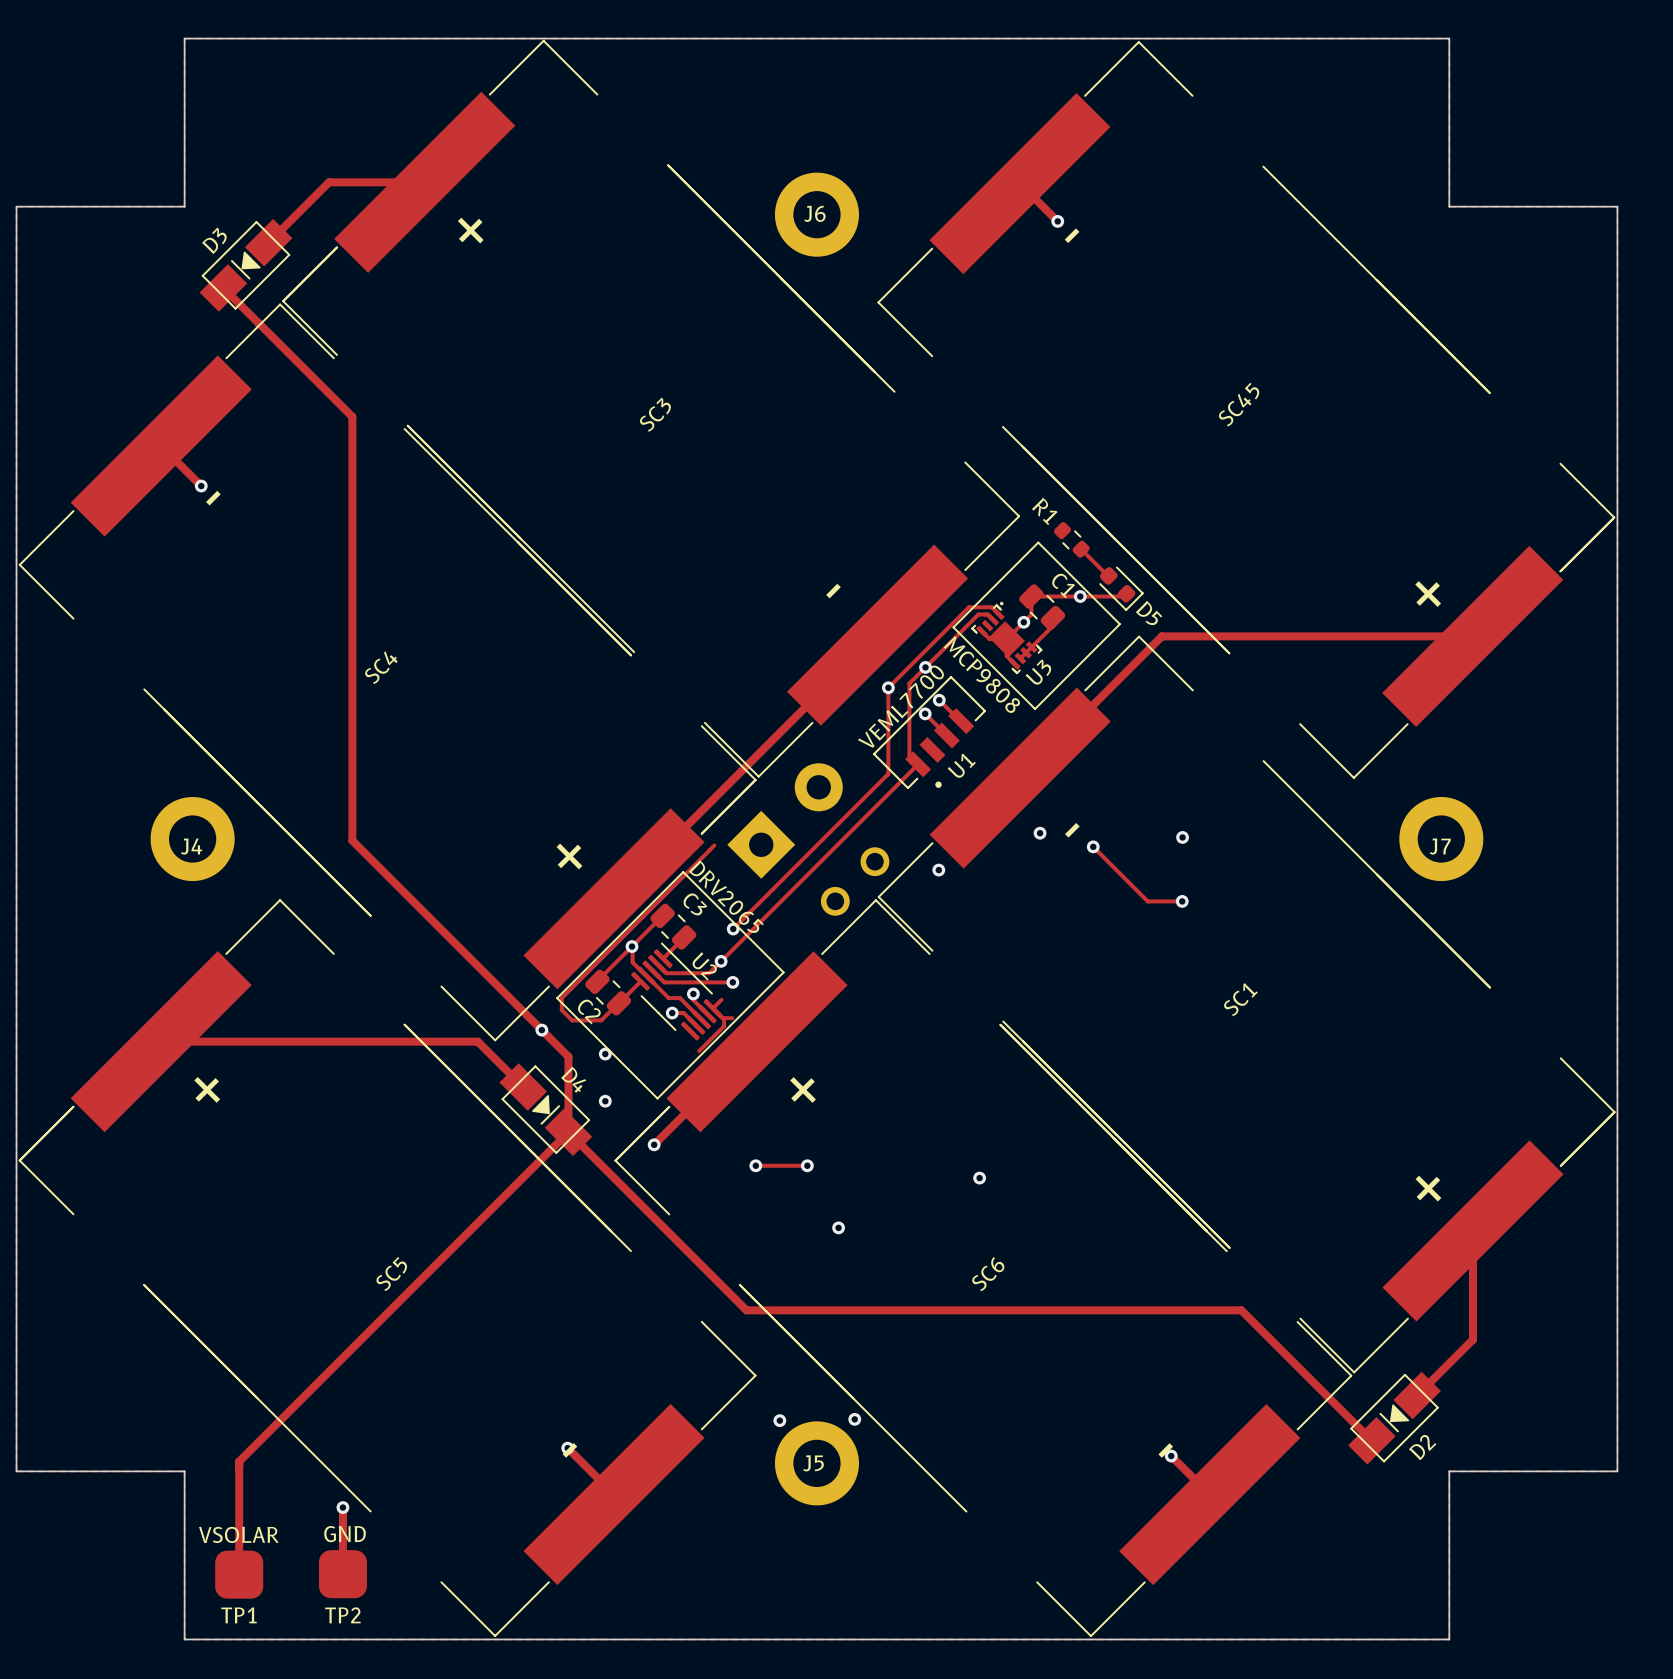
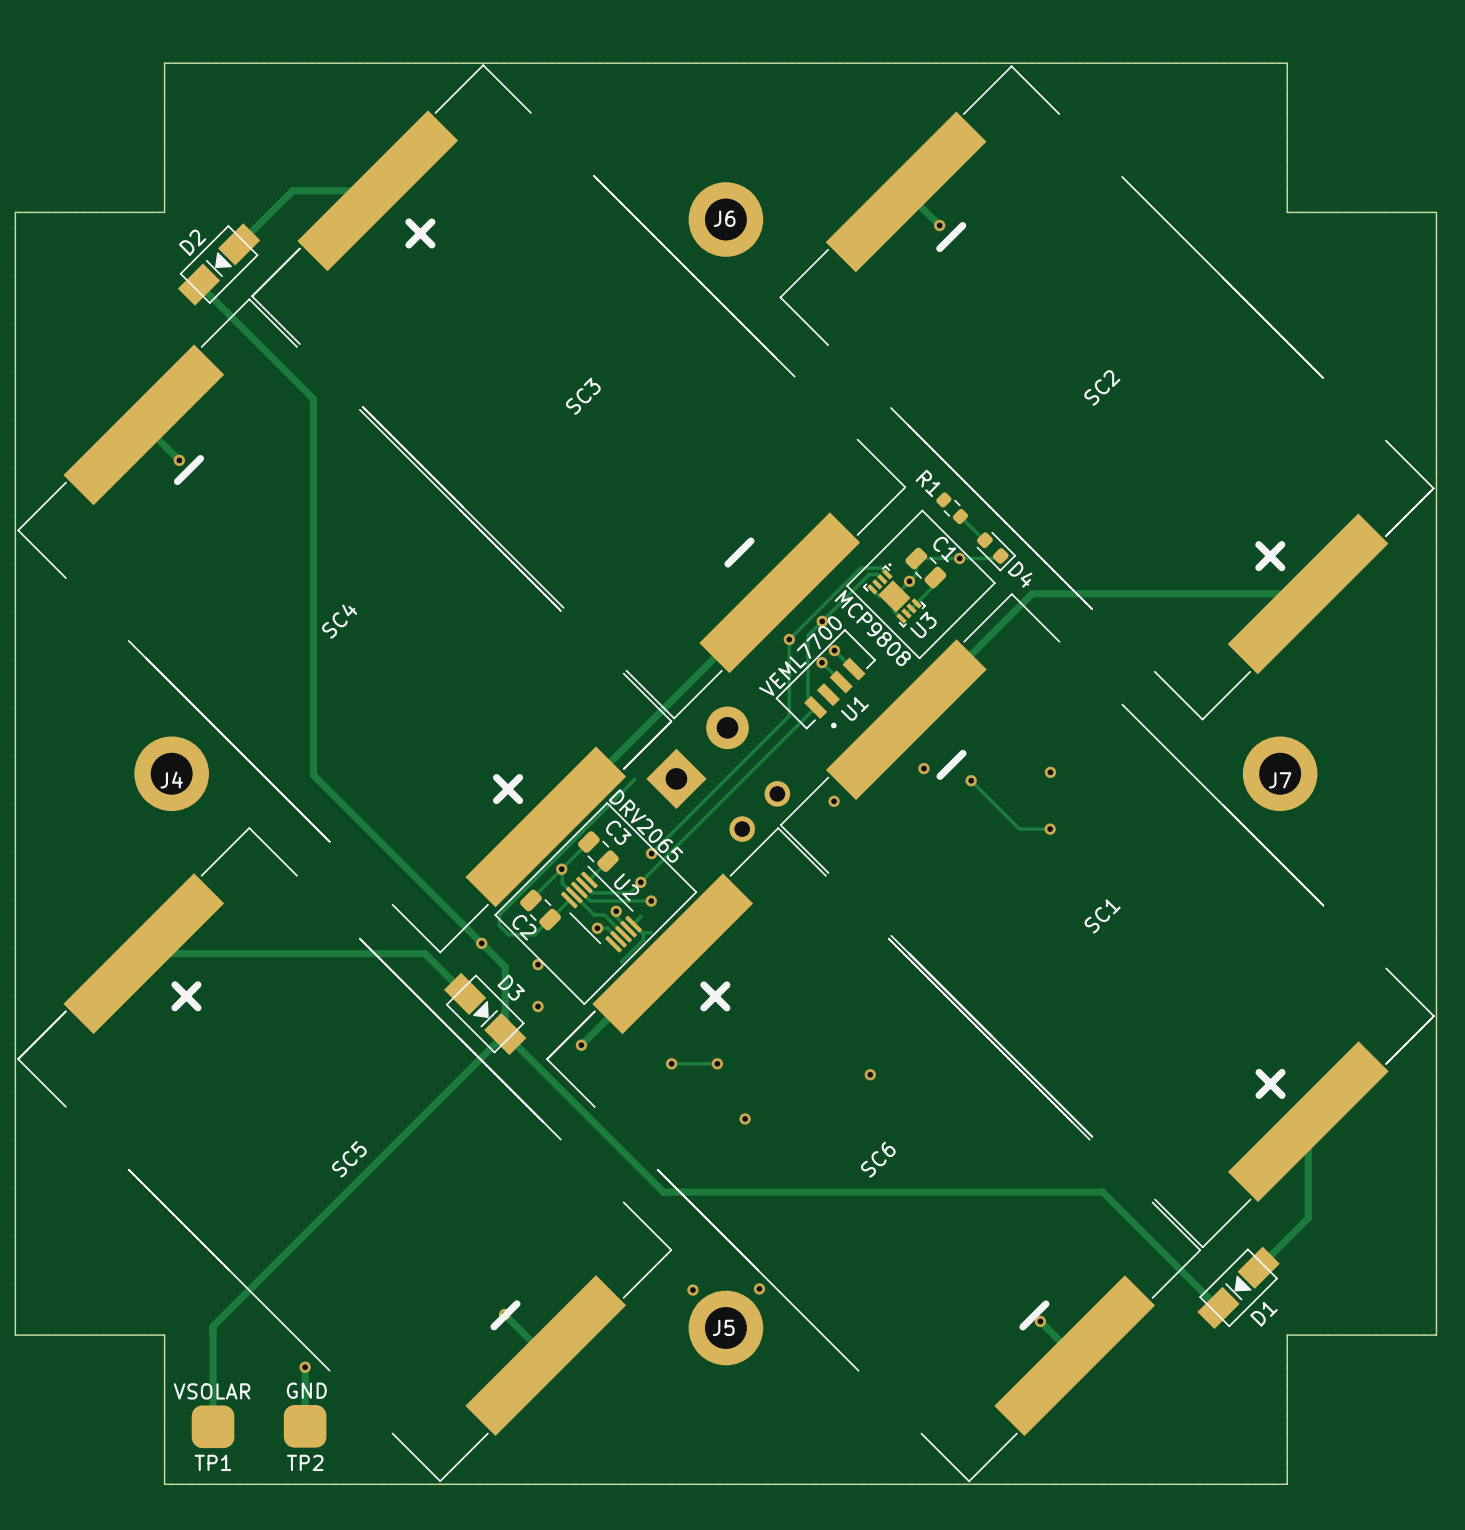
D3 name: D3 (214, 240) -> D2 (192, 242)
SC45 name: SC45 (1239, 404) -> SC2 (1102, 387)
D5 name: D5 (1149, 612) -> D4 (1020, 574)
D4 name: D4 (573, 1079) -> D3 (511, 987)
D2 name: D2 (1422, 1447) -> D1 (1263, 1314)

